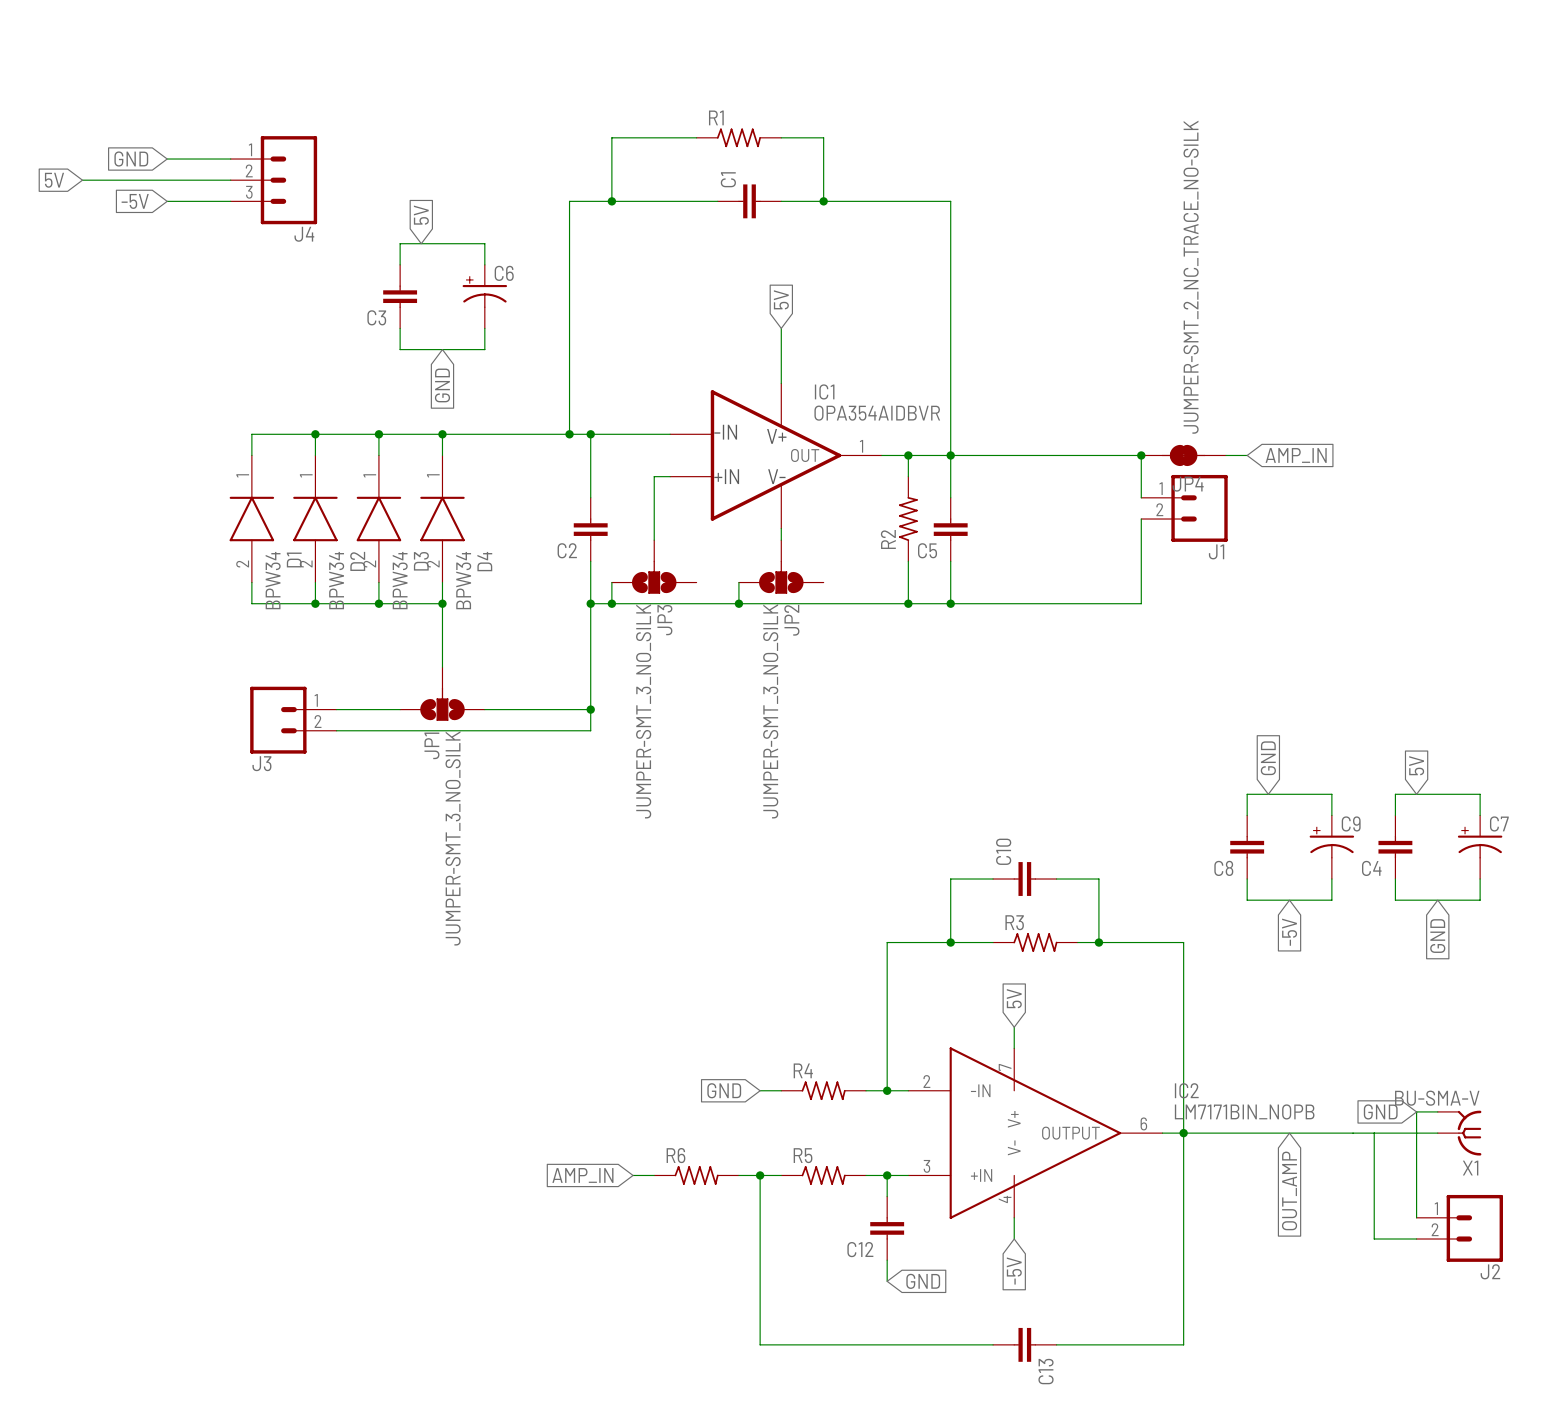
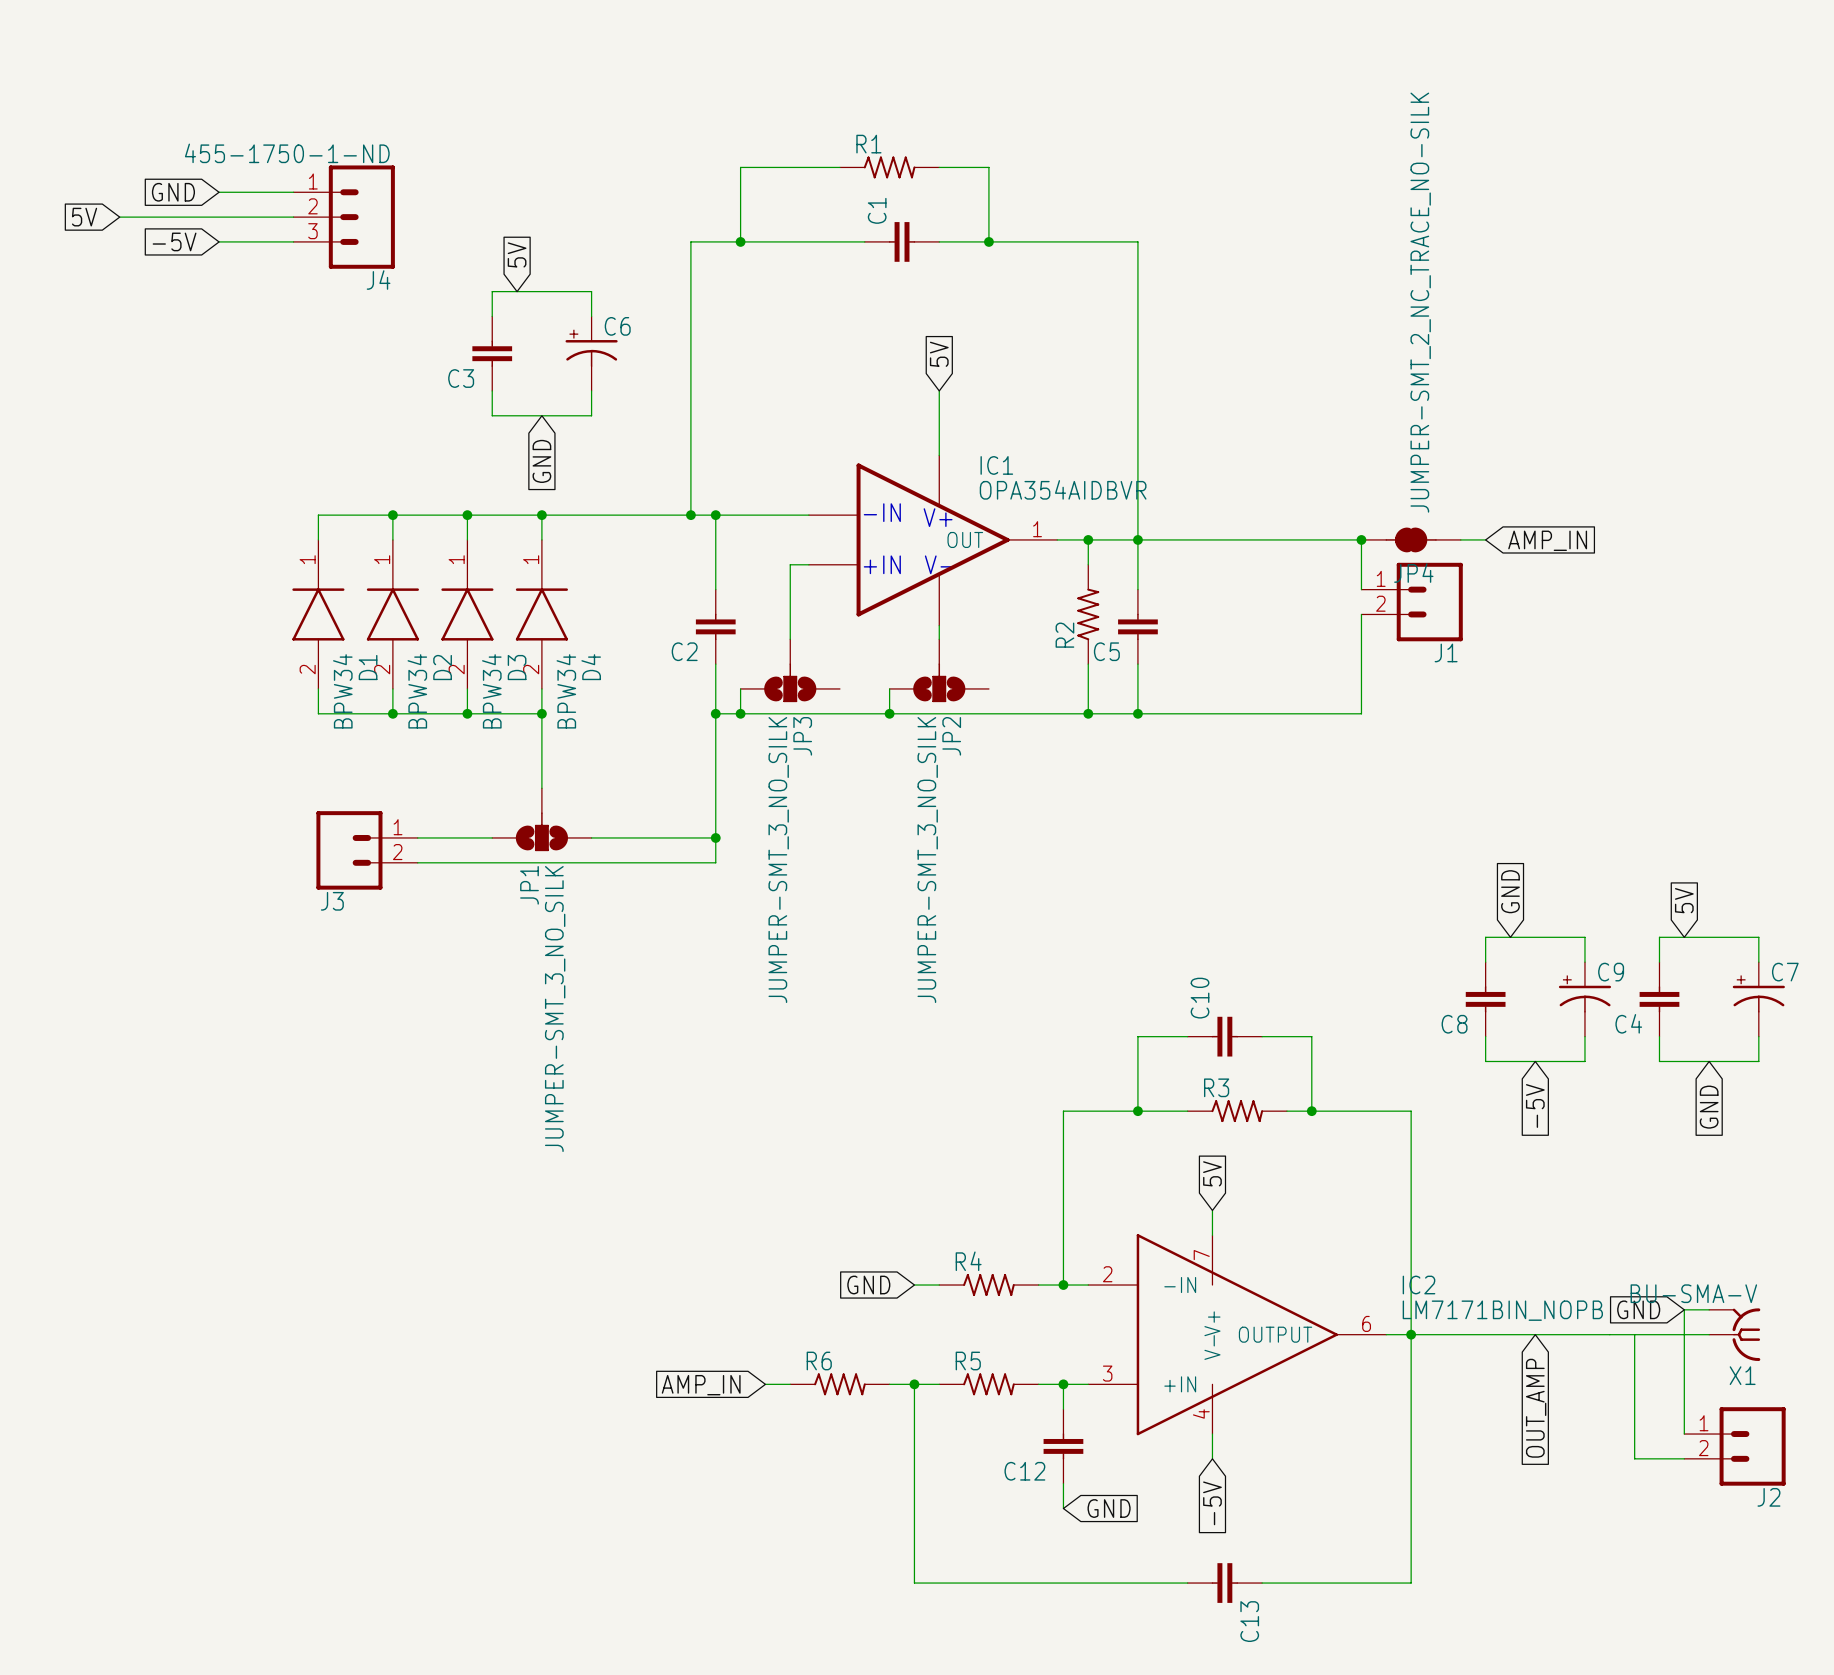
J4 value: none -> 455-1750-1-ND (287, 153)

